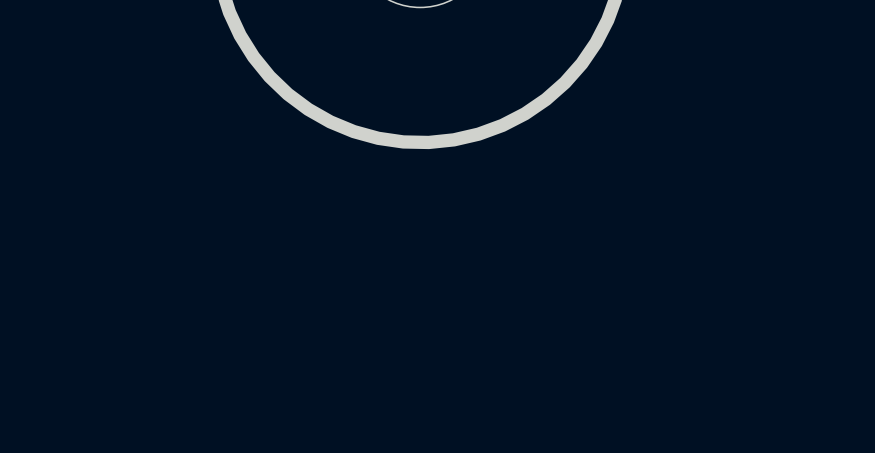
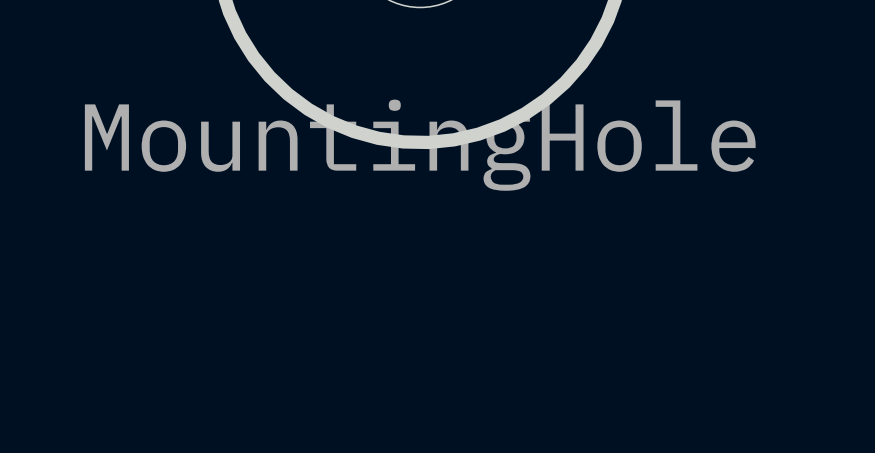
part value: none -> MountingHole (420, 145)

